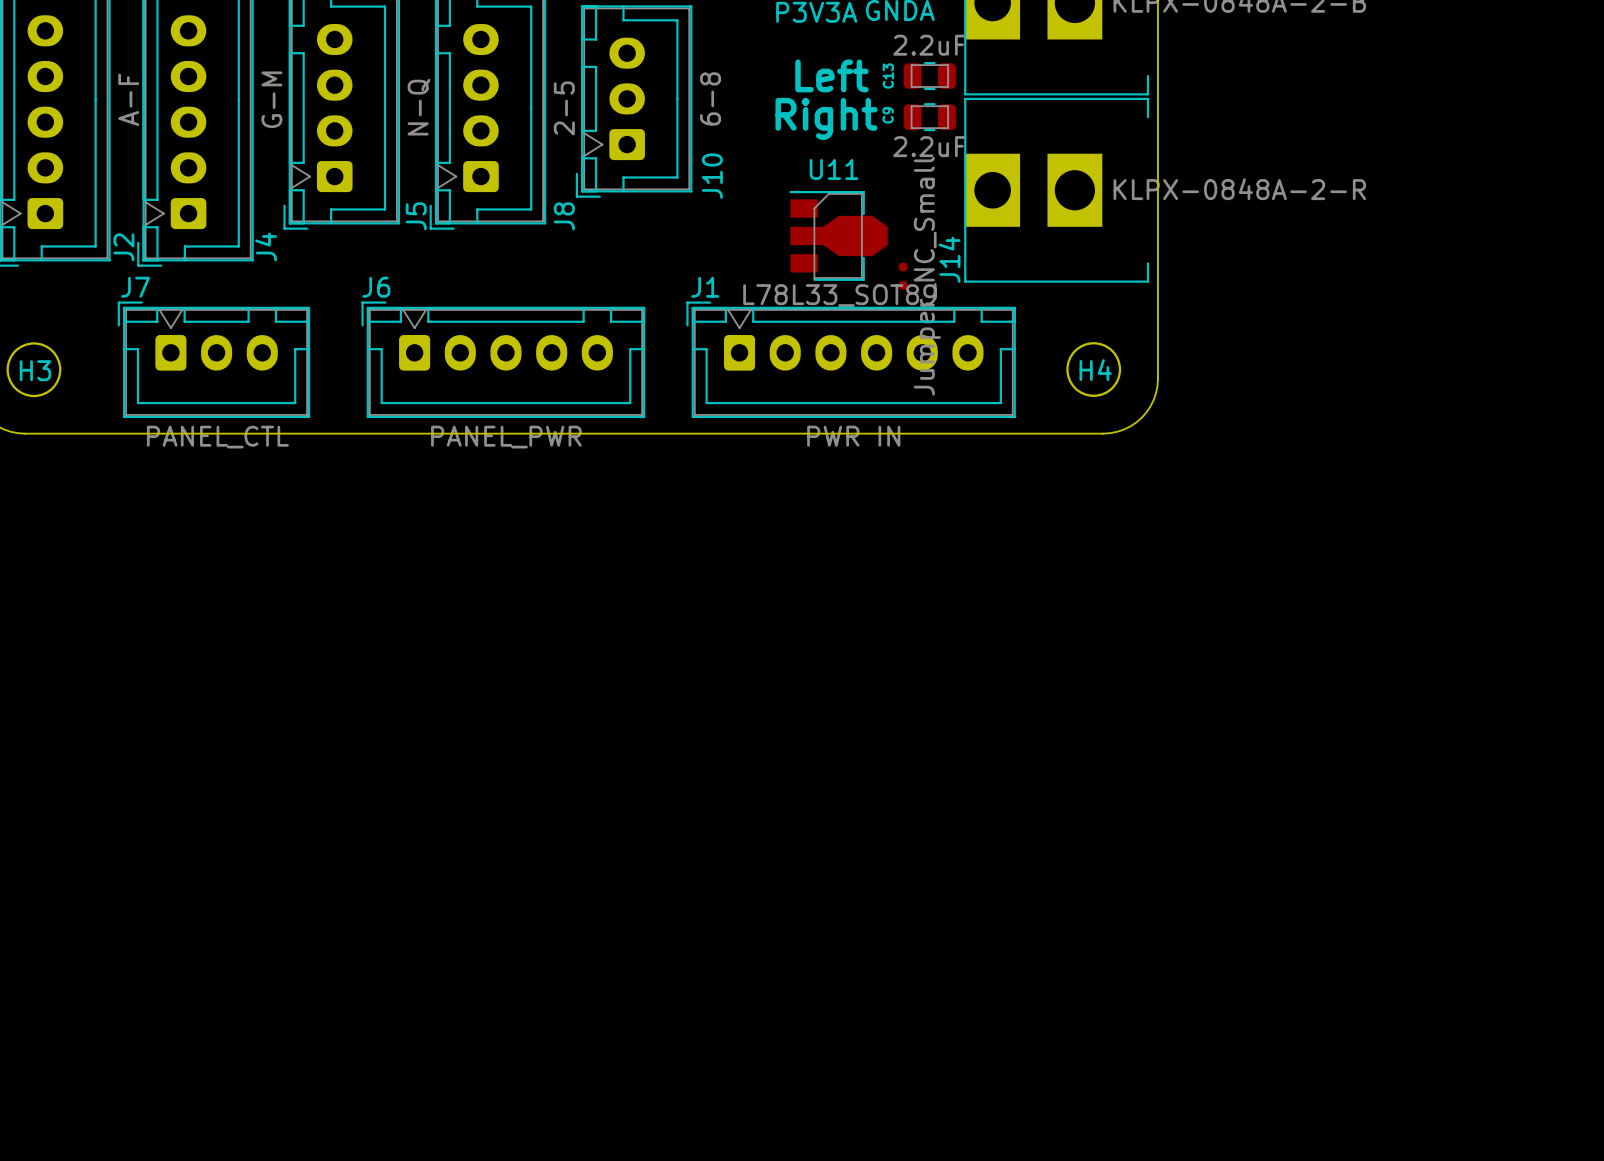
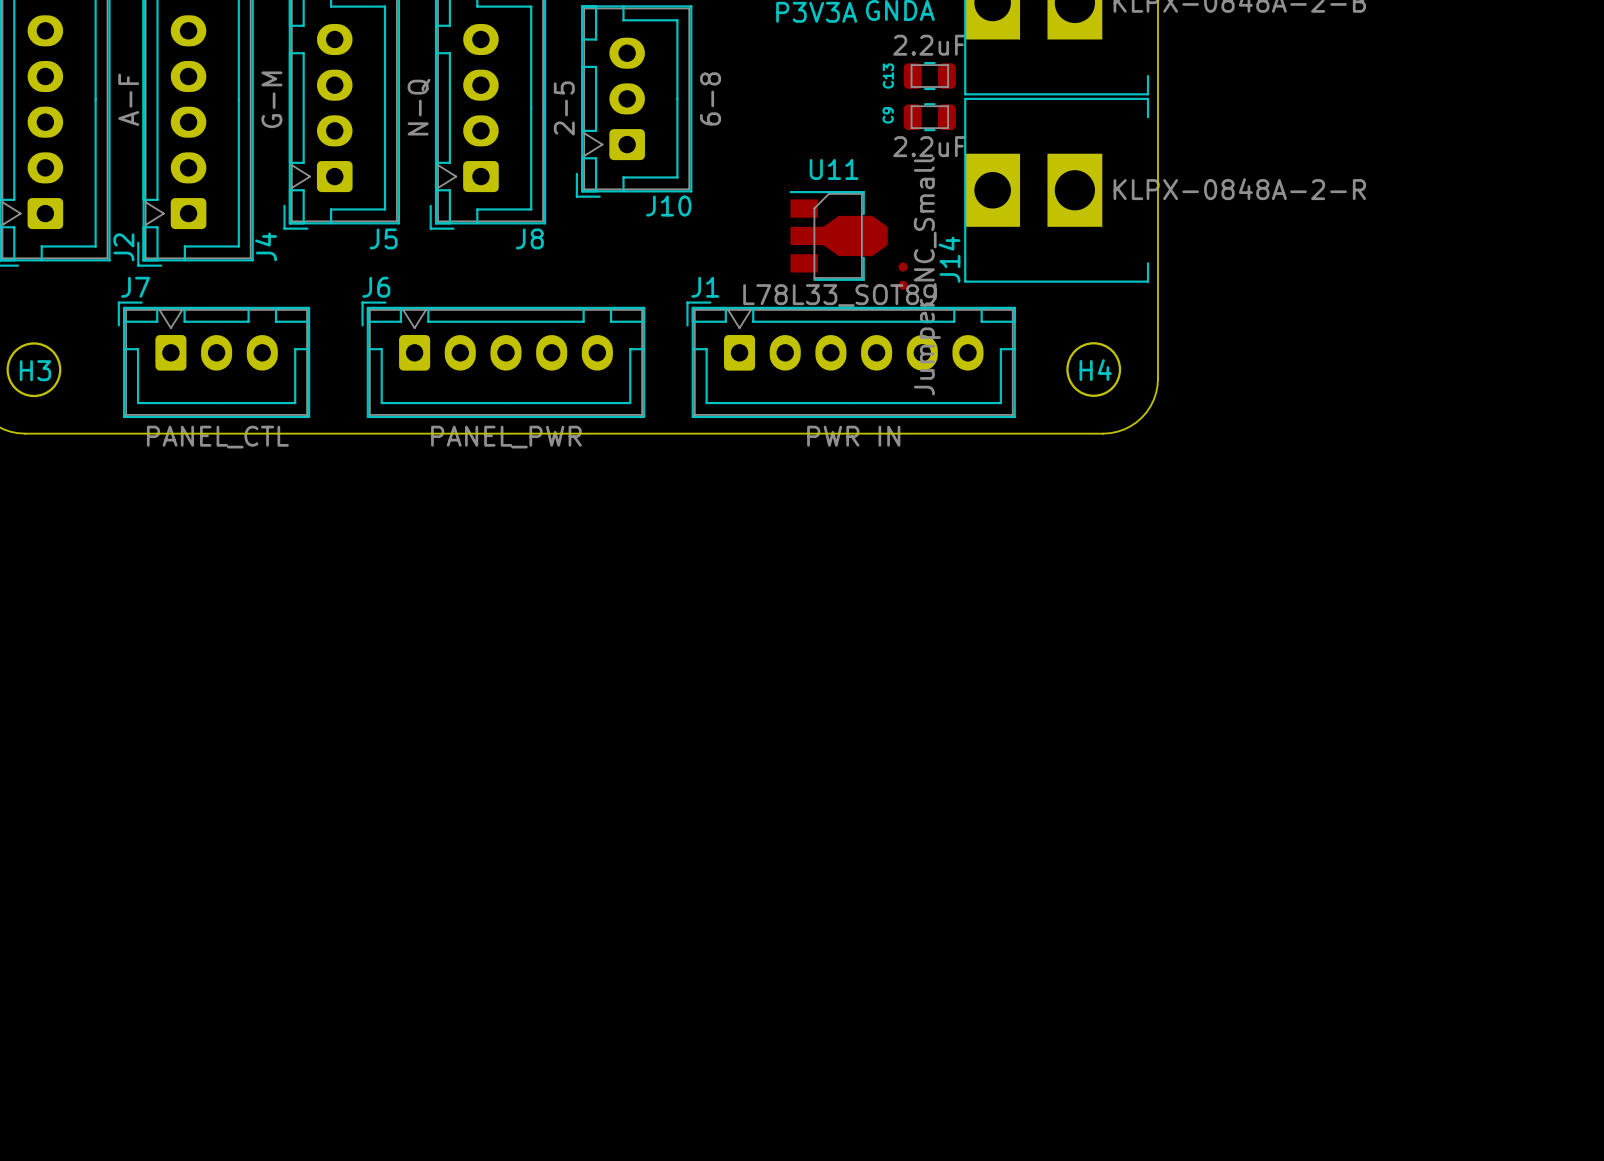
text: Left (831, 75) -> none
text: Right (826, 118) -> none
J10 name rotation: 0° (712, 176) -> 90° clockwise (668, 206)
J5 name rotation: 0° (416, 216) -> 90° clockwise (383, 238)
J8 name rotation: 0° (564, 216) -> 90° clockwise (529, 238)
J8 name position: J8 (564, 216) -> J8 (529, 238)

